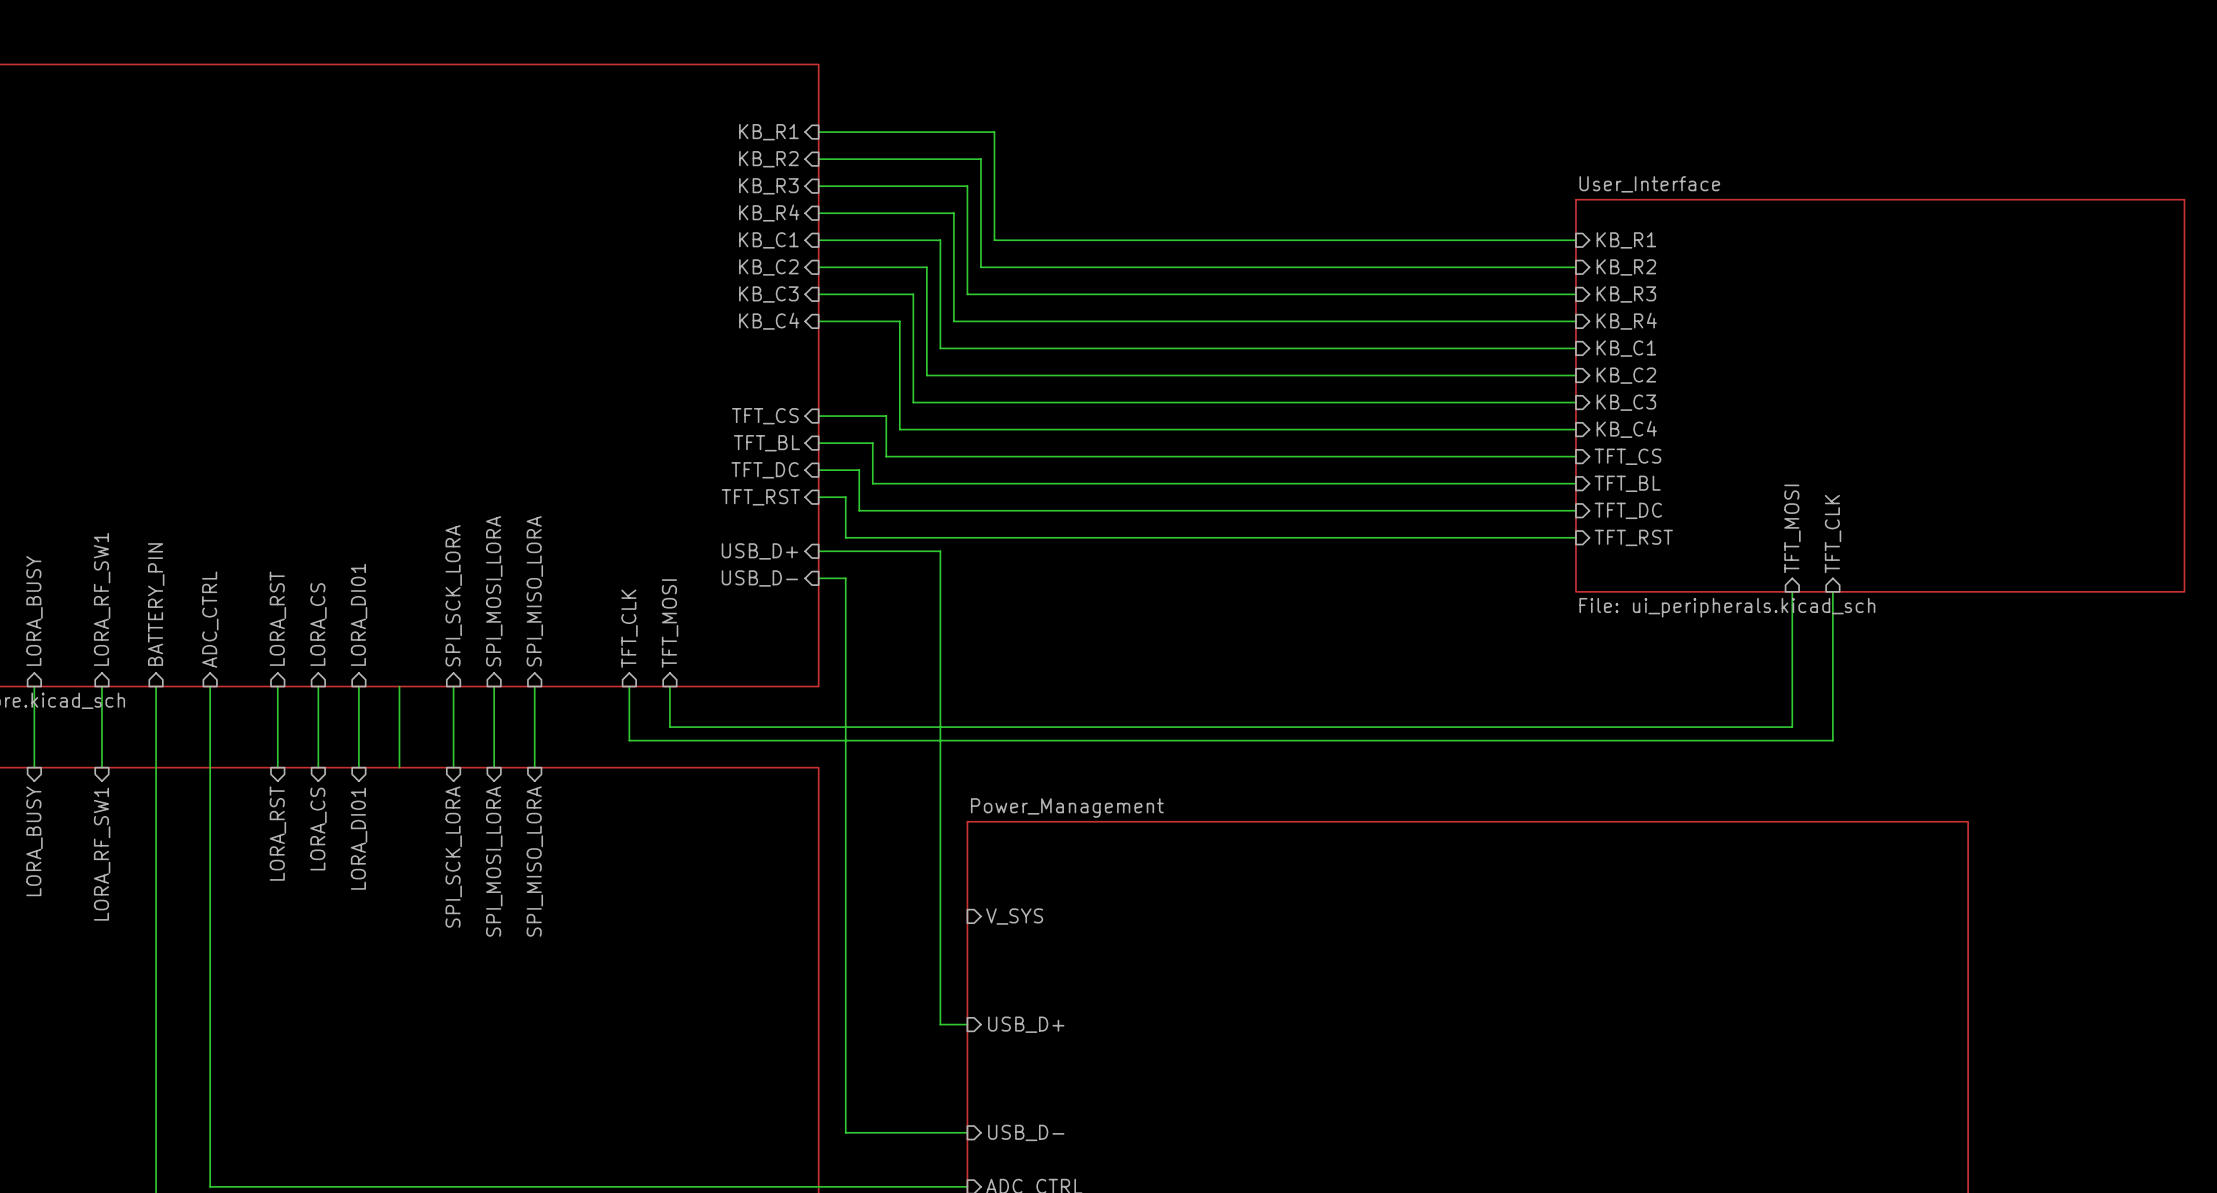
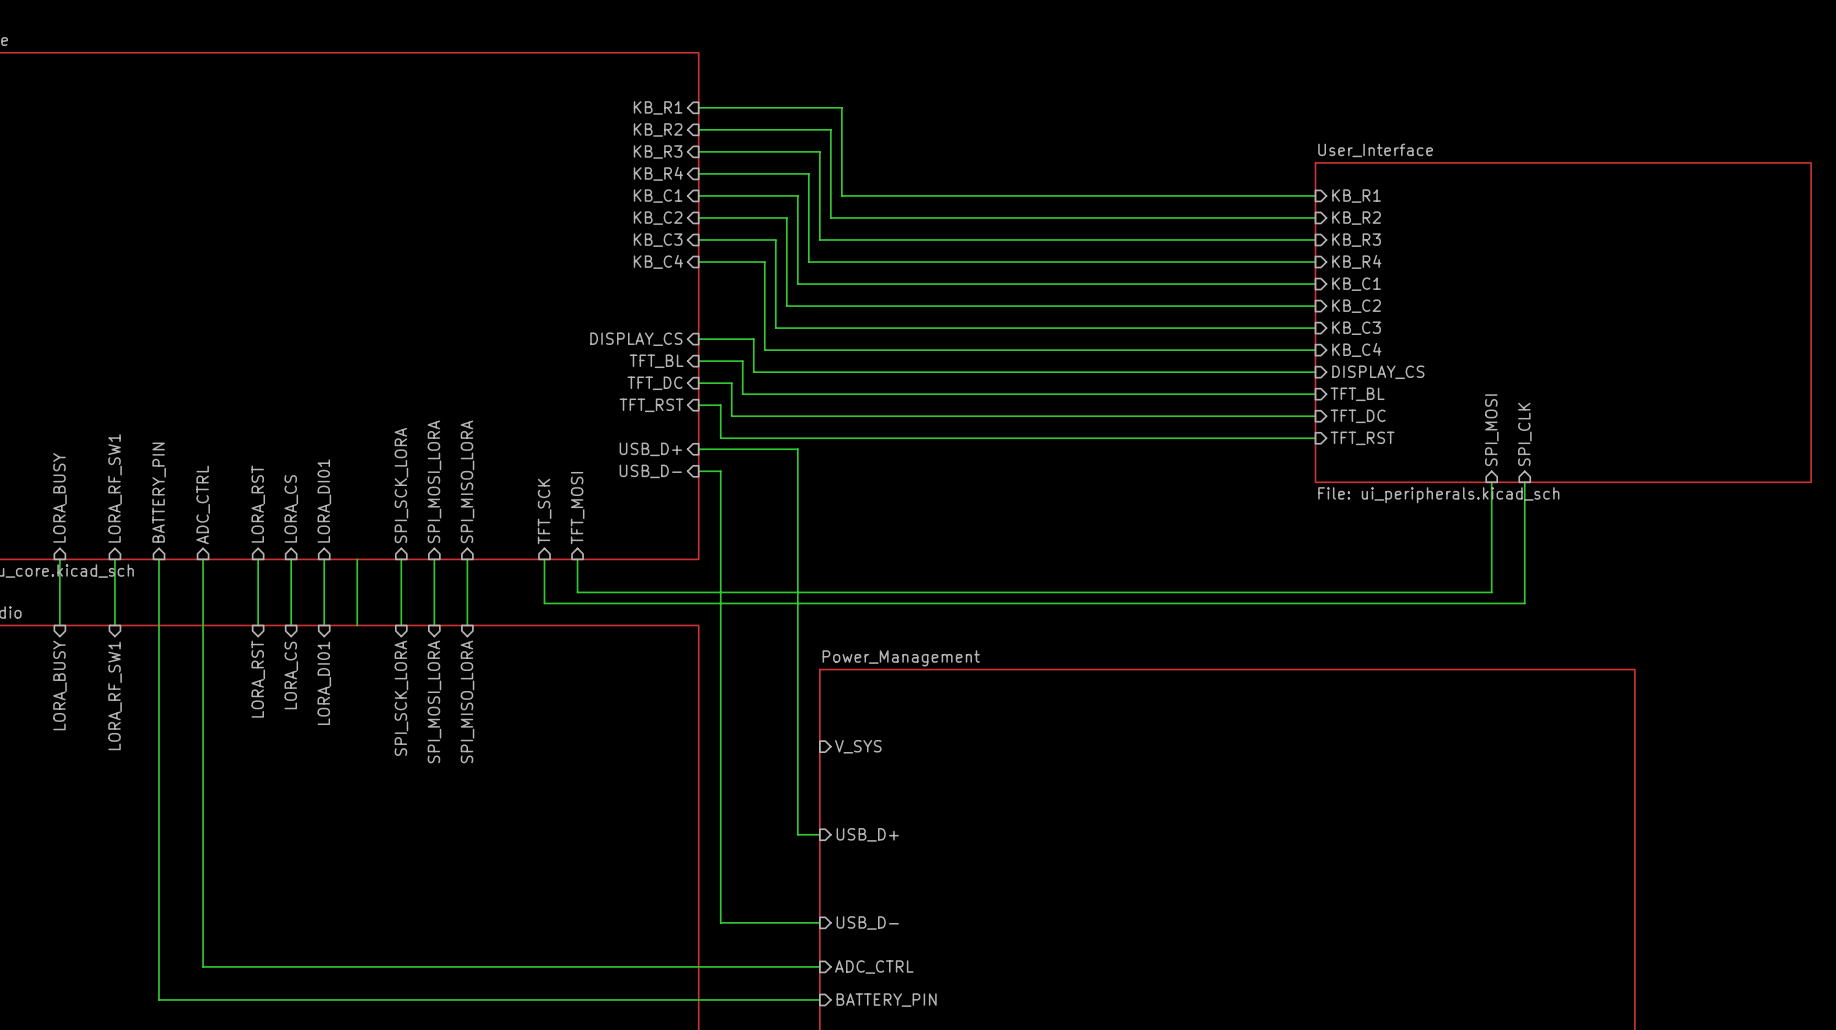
sheet pin: TFT_CS (765, 416) -> DISPLAY_CS (636, 339)
sheet pin: TFT_CS (1628, 456) -> DISPLAY_CS (1378, 372)
sheet pin: TFT_MOSI (1792, 528) -> SPI_MOSI (1491, 430)
sheet pin: TFT_CLK (1833, 534) -> SPI_CLK (1524, 434)
sheet pin: TFT_CLK (629, 628) -> TFT_SCK (544, 511)

